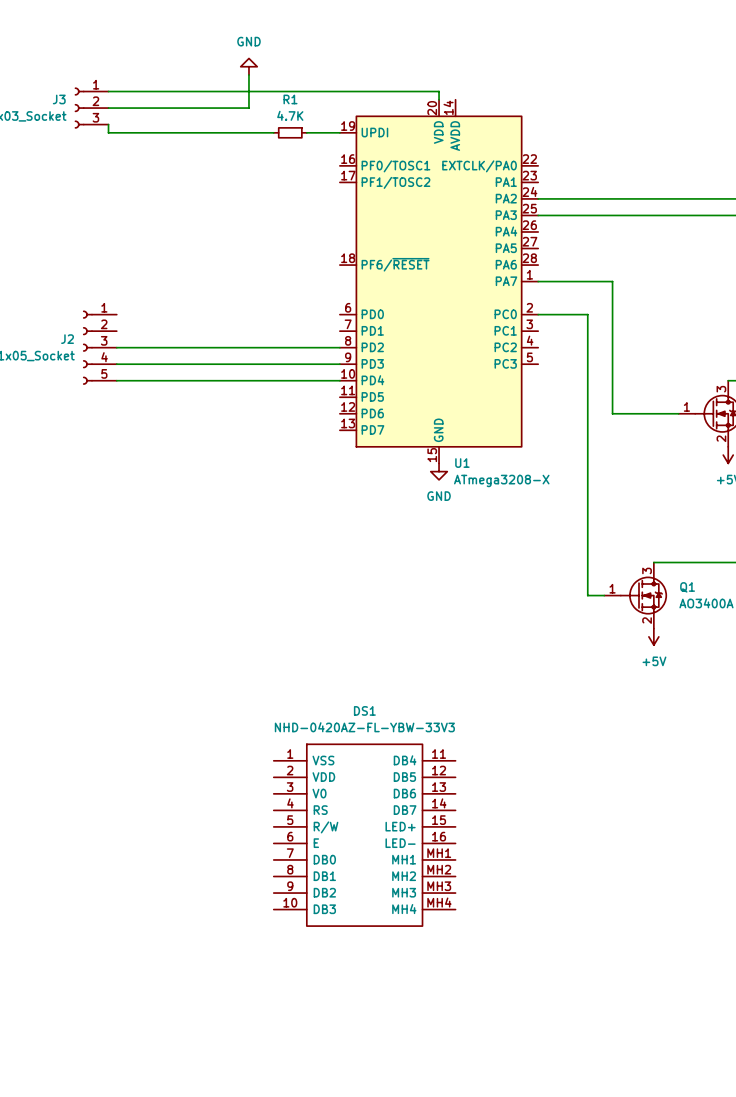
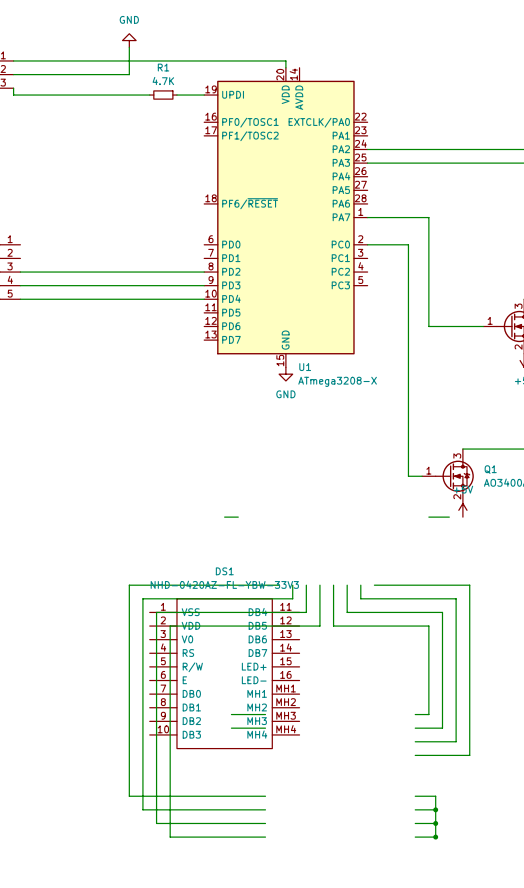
power symbol rotation: 0° (653, 636) -> 180° (462, 510)
wire: none -> (224, 517) (238, 517)
wire: none -> (428, 517) (449, 517)
wire: none -> (279, 585) (129, 585) (129, 796) (265, 796)
wire: none -> (292, 585) (292, 598) (142, 598) (142, 809) (265, 809)
wire: none -> (306, 585) (306, 612) (156, 612) (156, 823) (265, 823)
wire: none -> (319, 585) (319, 626) (170, 626) (170, 837) (265, 837)
wire: none -> (333, 585) (333, 626) (428, 626) (428, 714) (415, 714)
wire: none -> (347, 585) (347, 612) (442, 612) (442, 728) (415, 728)
wire: none -> (360, 585) (360, 598) (456, 598) (456, 741) (415, 741)
wire: none -> (374, 585) (469, 585) (469, 755) (415, 755)
wire: none -> (231, 714) (265, 714)
wire: none -> (231, 728) (265, 728)
wire: none -> (415, 796) (435, 796) (435, 837) (415, 837)
wire: none -> (415, 809) (435, 809)
junction: none -> (435, 809)
wire: none -> (415, 823) (435, 823)
junction: none -> (435, 823)
junction: none -> (435, 837)

